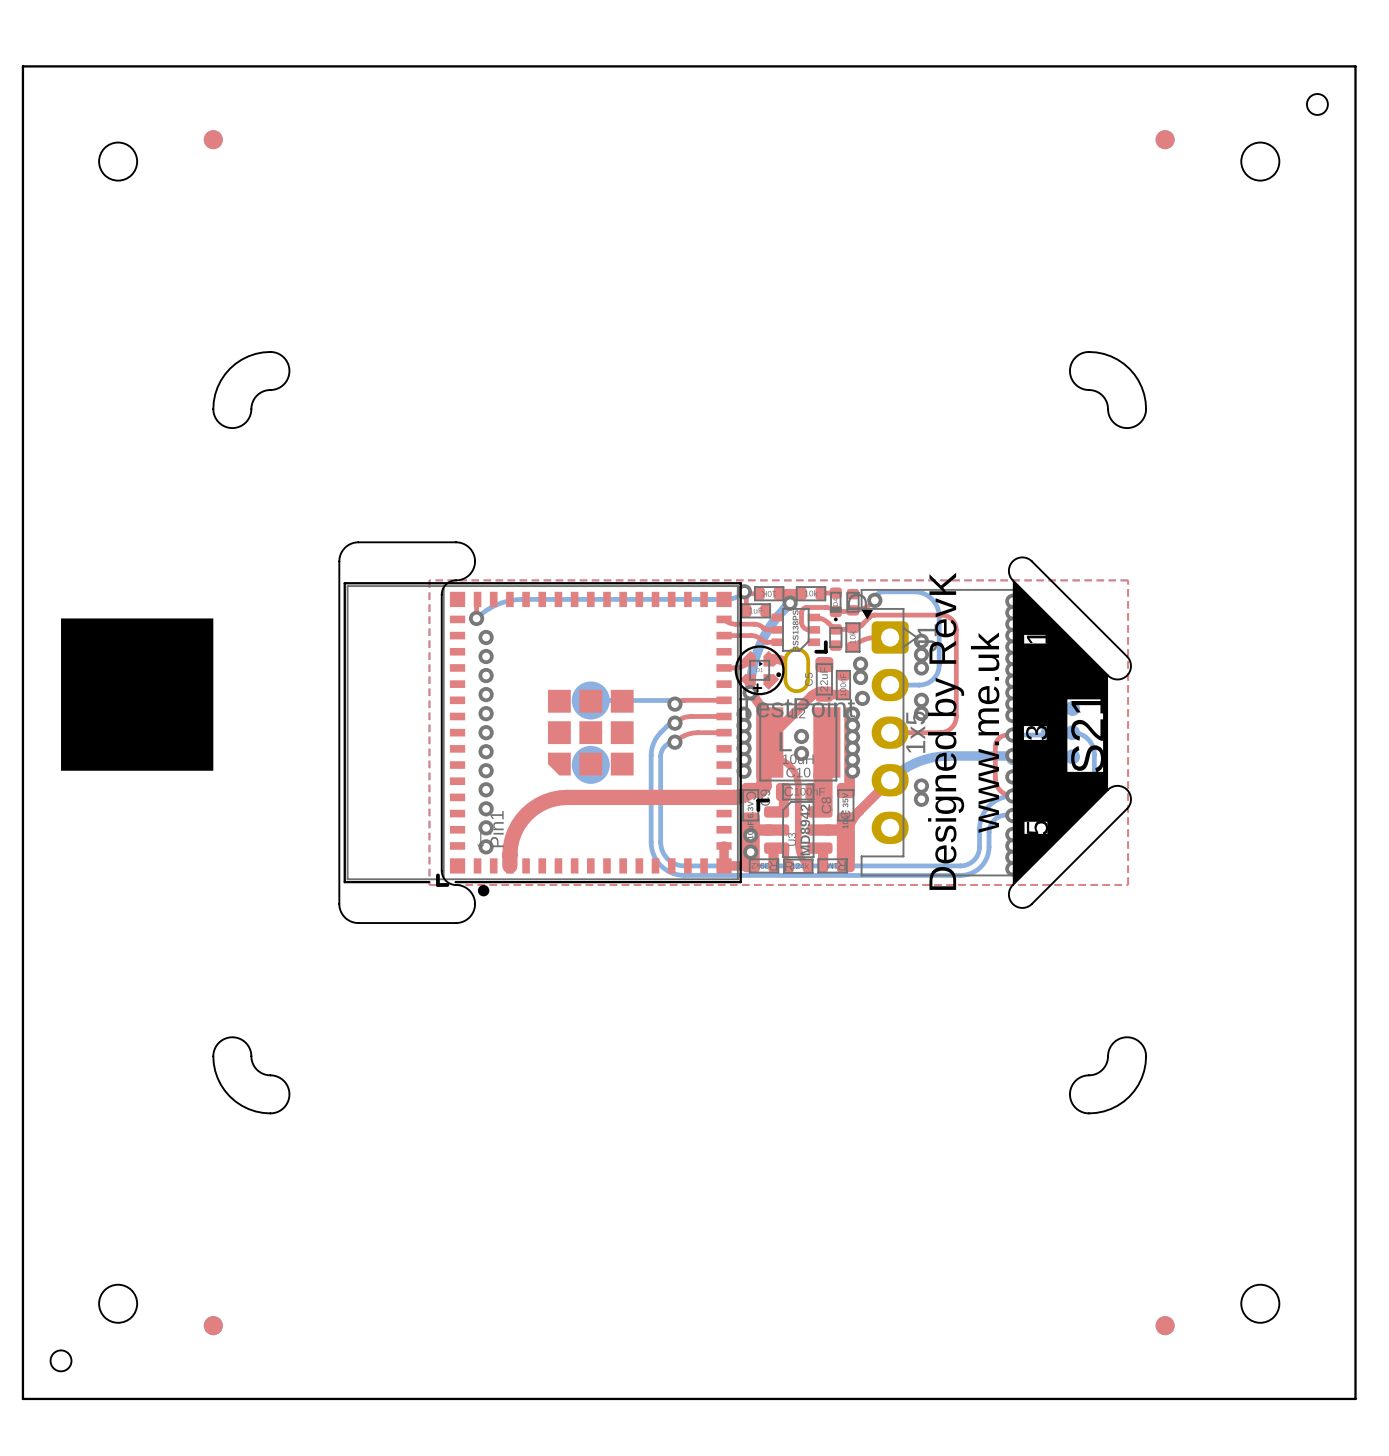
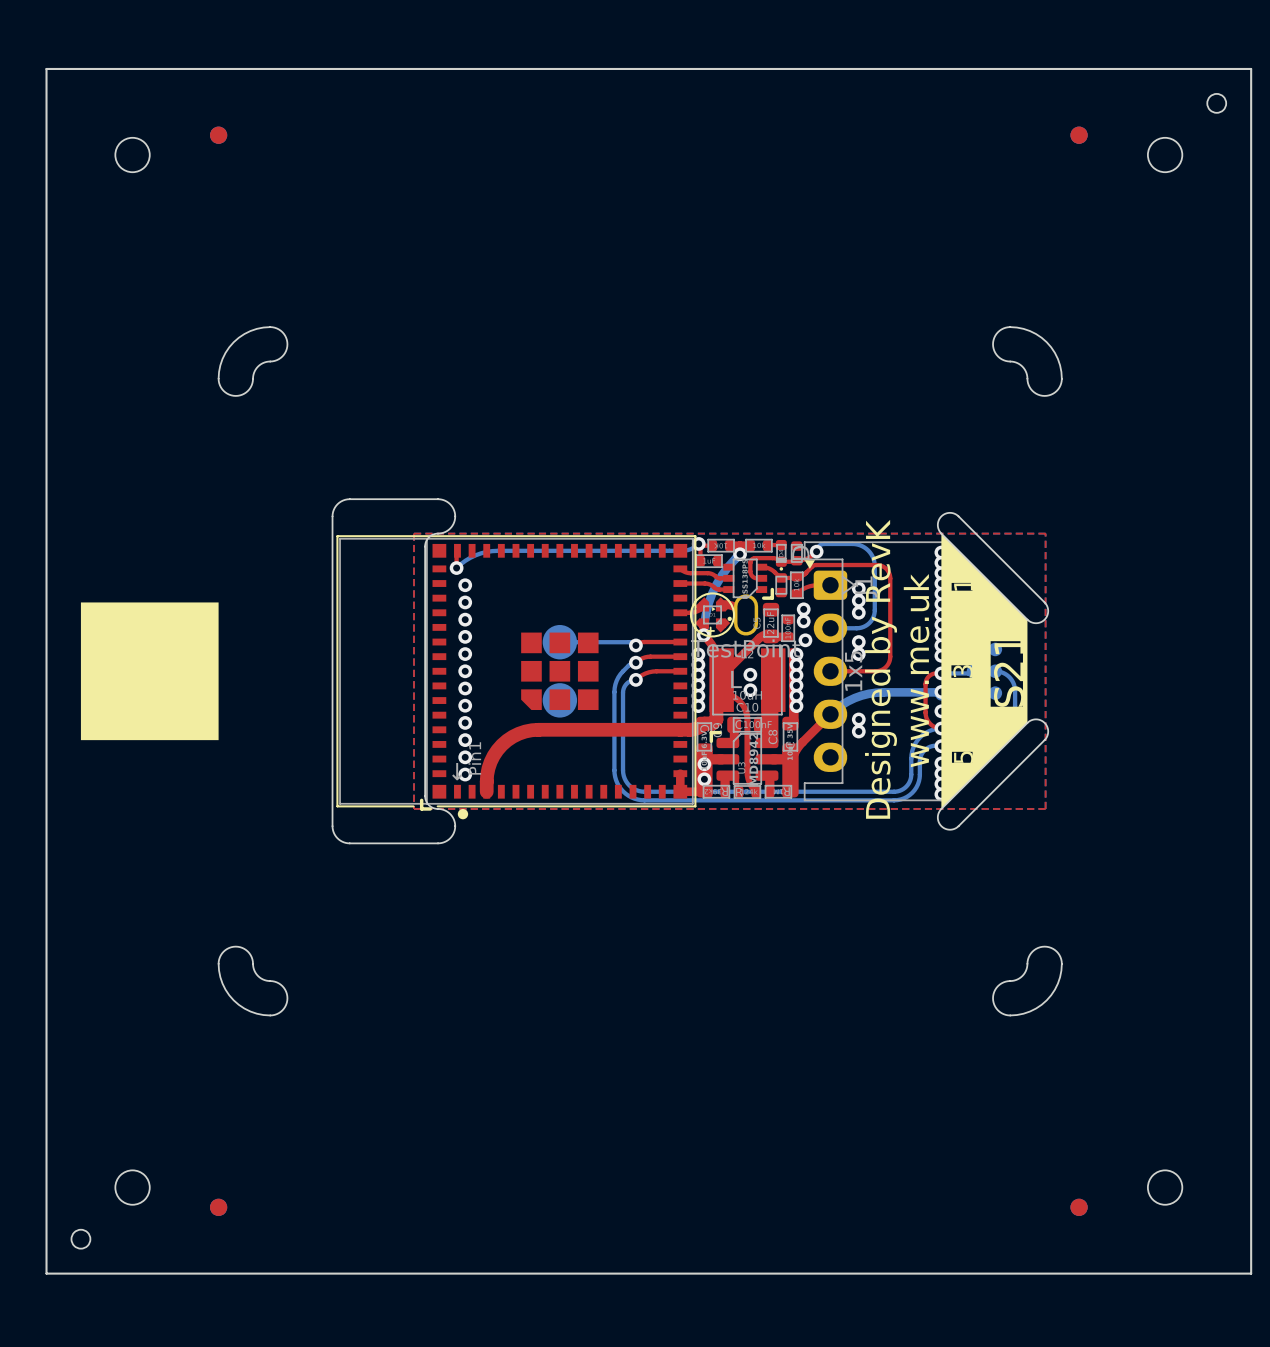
drawing position: (137, 694) -> (149, 671)

